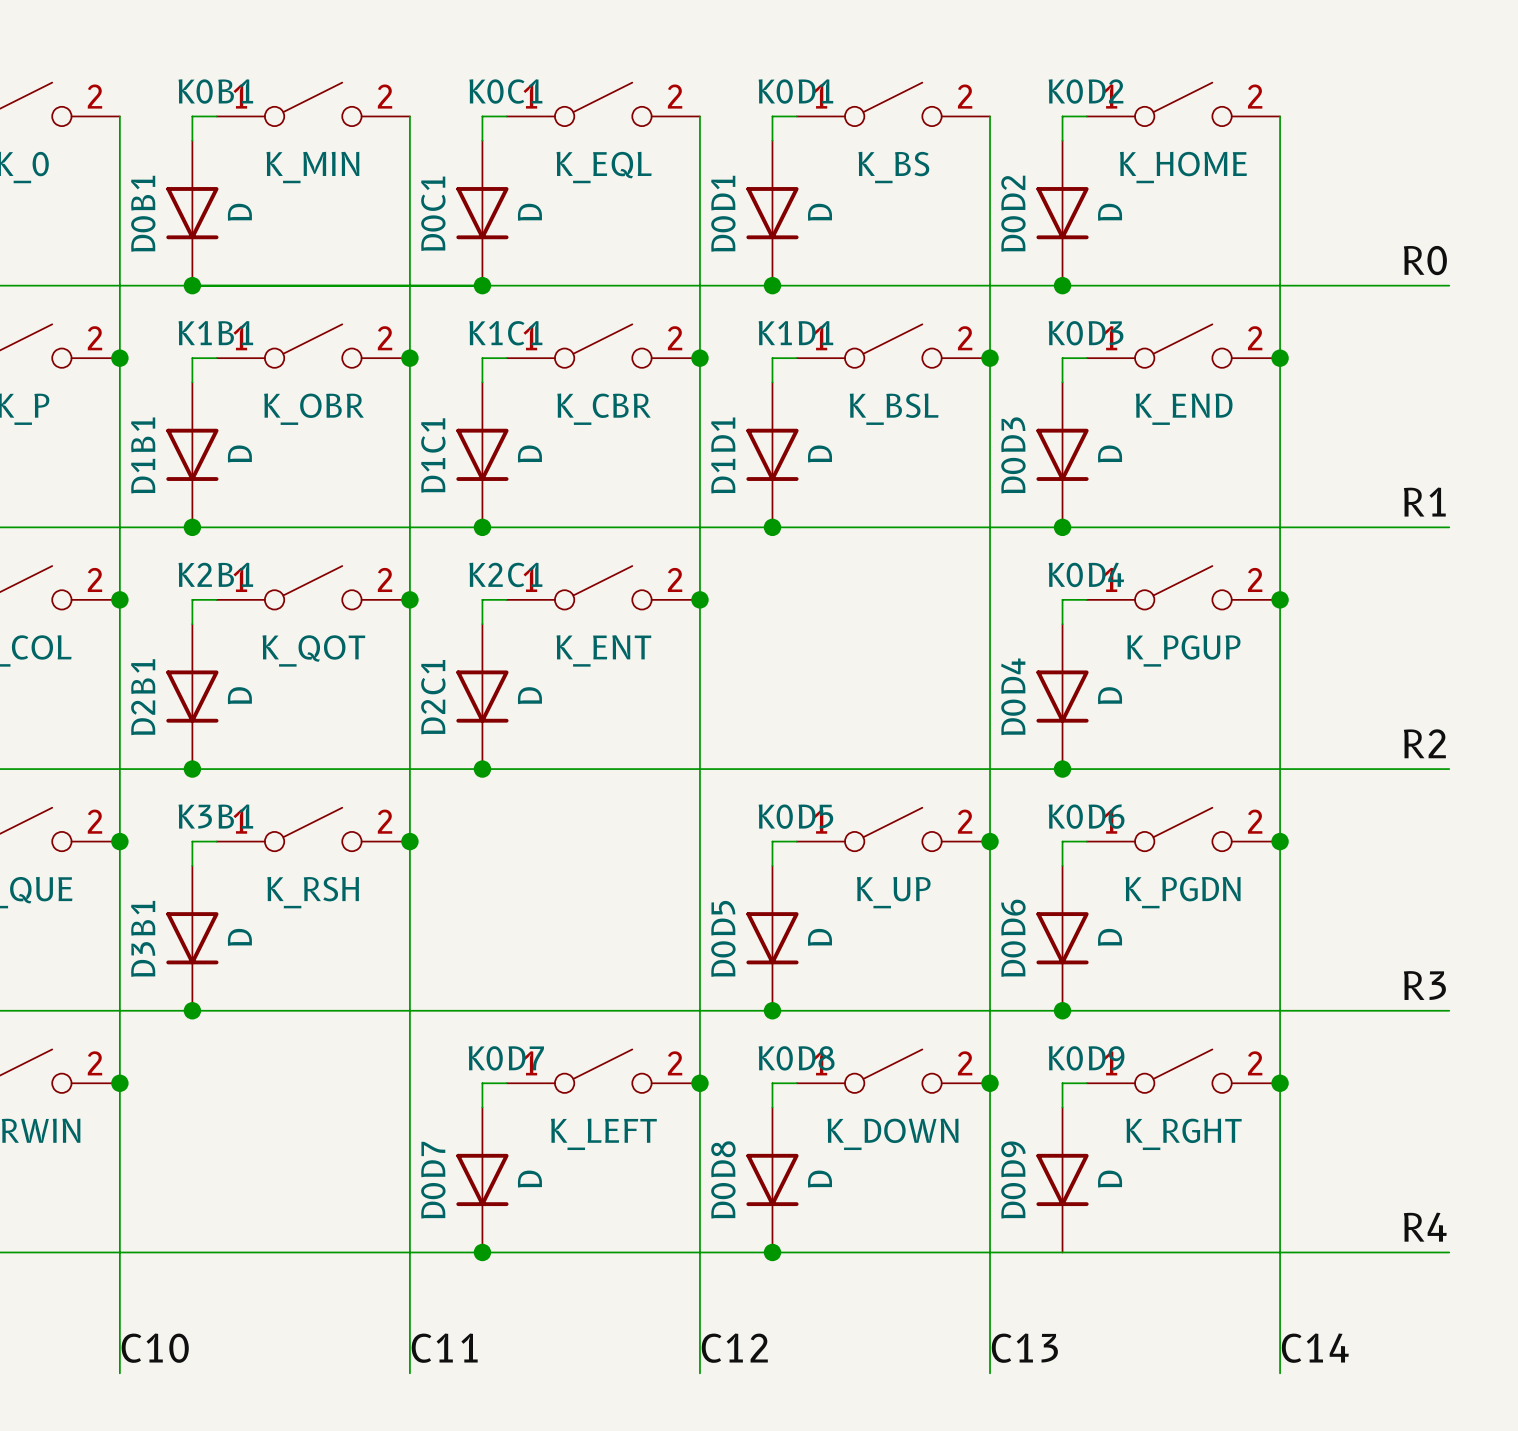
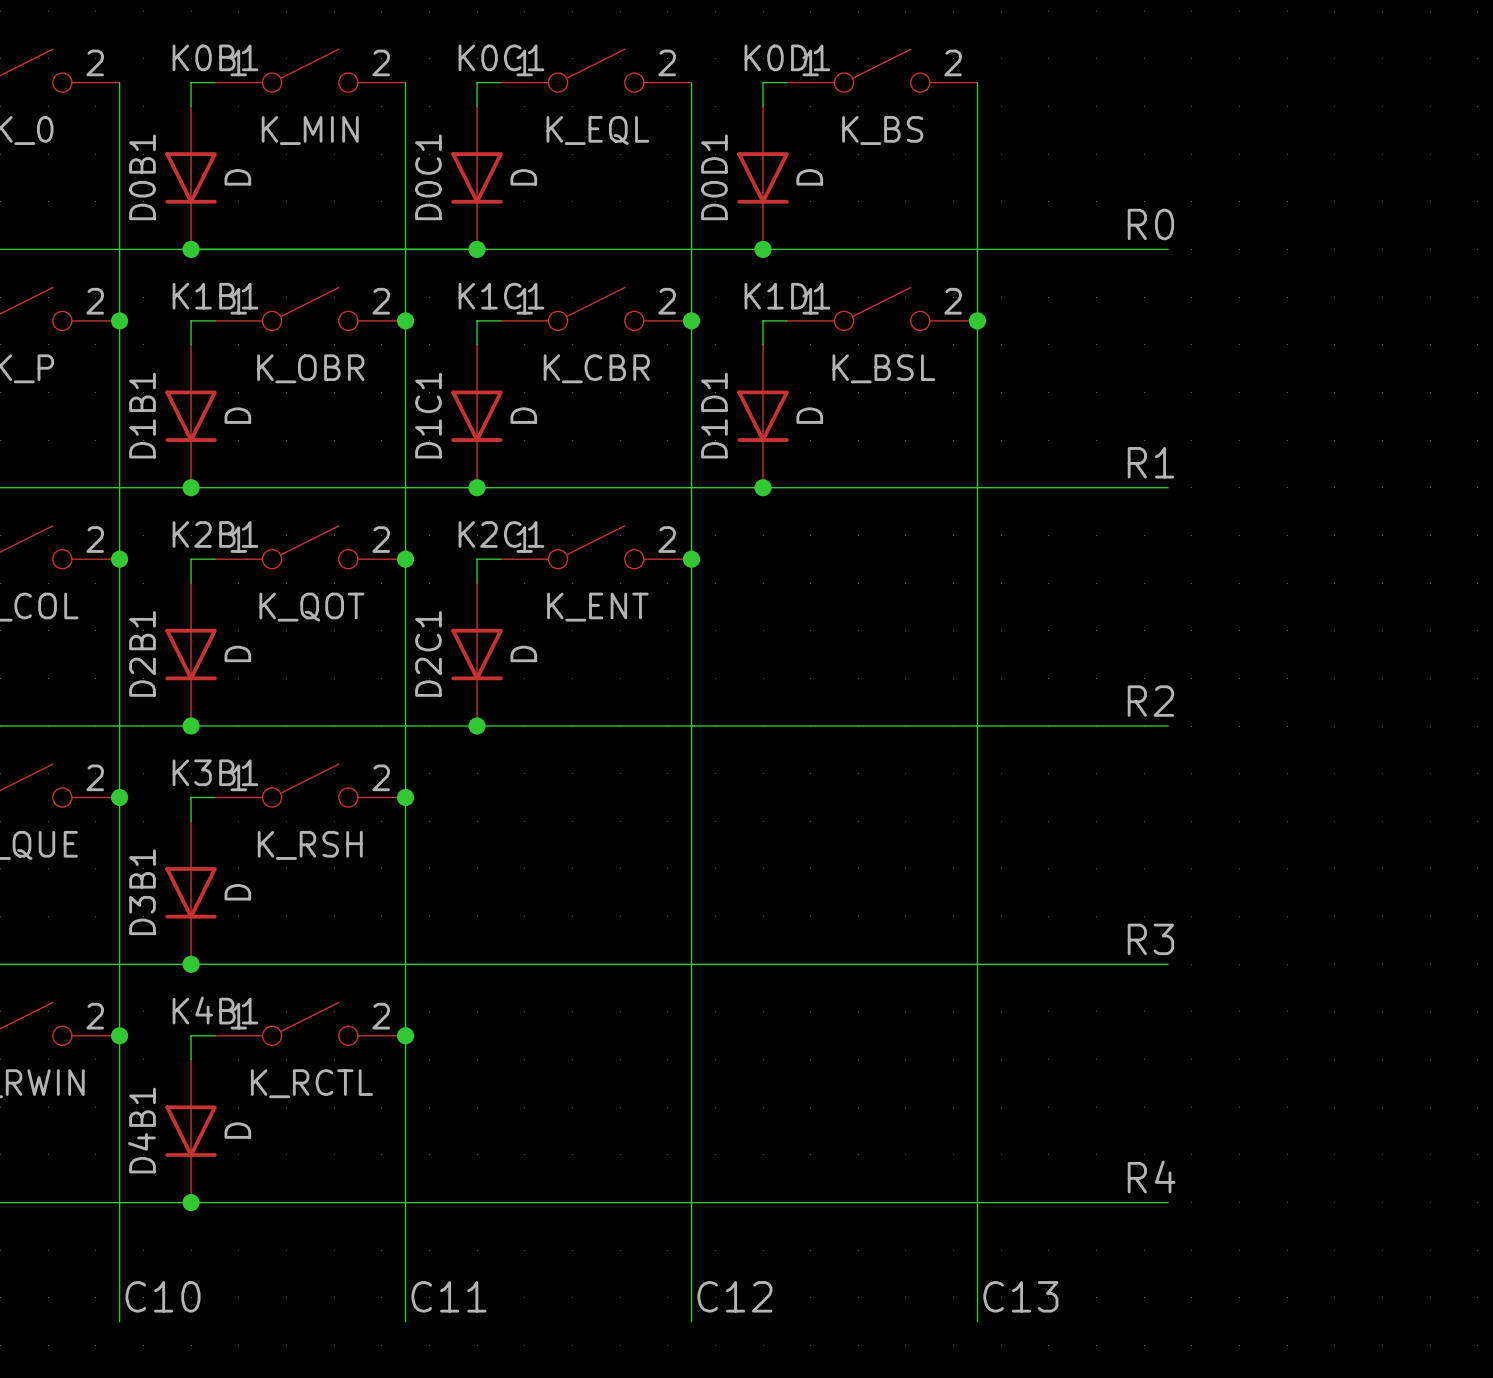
K0D2: K_HOME (1183, 104) -> none
wire: (1086, 116) (1062, 116) (1062, 140) -> none
wire: (1280, 116) (1280, 1373) -> none
D0D2: D (1062, 213) -> none
label position: R0 (1425, 260) -> R0 (1150, 224)
junction: (1062, 285) -> none
wire: (1183, 285) (1449, 285) -> none
K0D3: K_END (1183, 346) -> none
wire: (1086, 358) (1062, 358) (1062, 382) -> none
junction: (1280, 358) -> none
D0D3: D (1062, 454) -> none
label position: R1 (1424, 502) -> R1 (1150, 462)
junction: (1062, 527) -> none
wire: (1183, 527) (1449, 527) -> none
K0D4: K_PGUP (1183, 587) -> none
wire: (1086, 599) (1062, 599) (1062, 624) -> none
junction: (1280, 599) -> none
D0D4: D (1062, 696) -> none
label position: R2 (1424, 743) -> R2 (1150, 701)
junction: (1062, 769) -> none
wire: (1183, 769) (1449, 769) -> none
K0D5: K_UP (893, 829) -> none
K0D6: K_PGDN (1183, 829) -> none
wire: (796, 841) (772, 841) (772, 865) -> none
junction: (990, 841) -> none
wire: (1086, 841) (1062, 841) (1062, 865) -> none
junction: (1280, 841) -> none
D0D5: D (772, 938) -> none
D0D6: D (1062, 938) -> none
label position: R3 (1424, 985) -> R3 (1150, 939)
junction: (772, 1010) -> none
junction: (1062, 1010) -> none
wire: (1183, 1010) (1449, 1010) -> none
K4B1: none -> K_RCTL (310, 1023)
K0D7: K_LEFT (603, 1071) -> none
K0D8: K_DOWN (893, 1071) -> none
K0D9: K_RGHT (1183, 1071) -> none
junction: none -> (405, 1035)
wire: (506, 1083) (482, 1083) (482, 1107) -> (214, 1035) (191, 1035) (191, 1059)
junction: (699, 1083) -> none
wire: (796, 1083) (772, 1083) (772, 1107) -> none
junction: (990, 1083) -> none
wire: (1086, 1083) (1062, 1083) (1062, 1107) -> none
junction: (1280, 1083) -> none
D4B1: none -> D (191, 1131)
D0D7: D (482, 1179) -> none
D0D8: D (772, 1179) -> none
D0D9: D (1062, 1179) -> none
label position: R4 (1425, 1227) -> R4 (1151, 1176)
junction: none -> (191, 1202)
junction: (482, 1252) -> none
junction: (772, 1252) -> none
wire: (1183, 1252) (1449, 1252) -> none
label: C14 (1315, 1348) -> none

